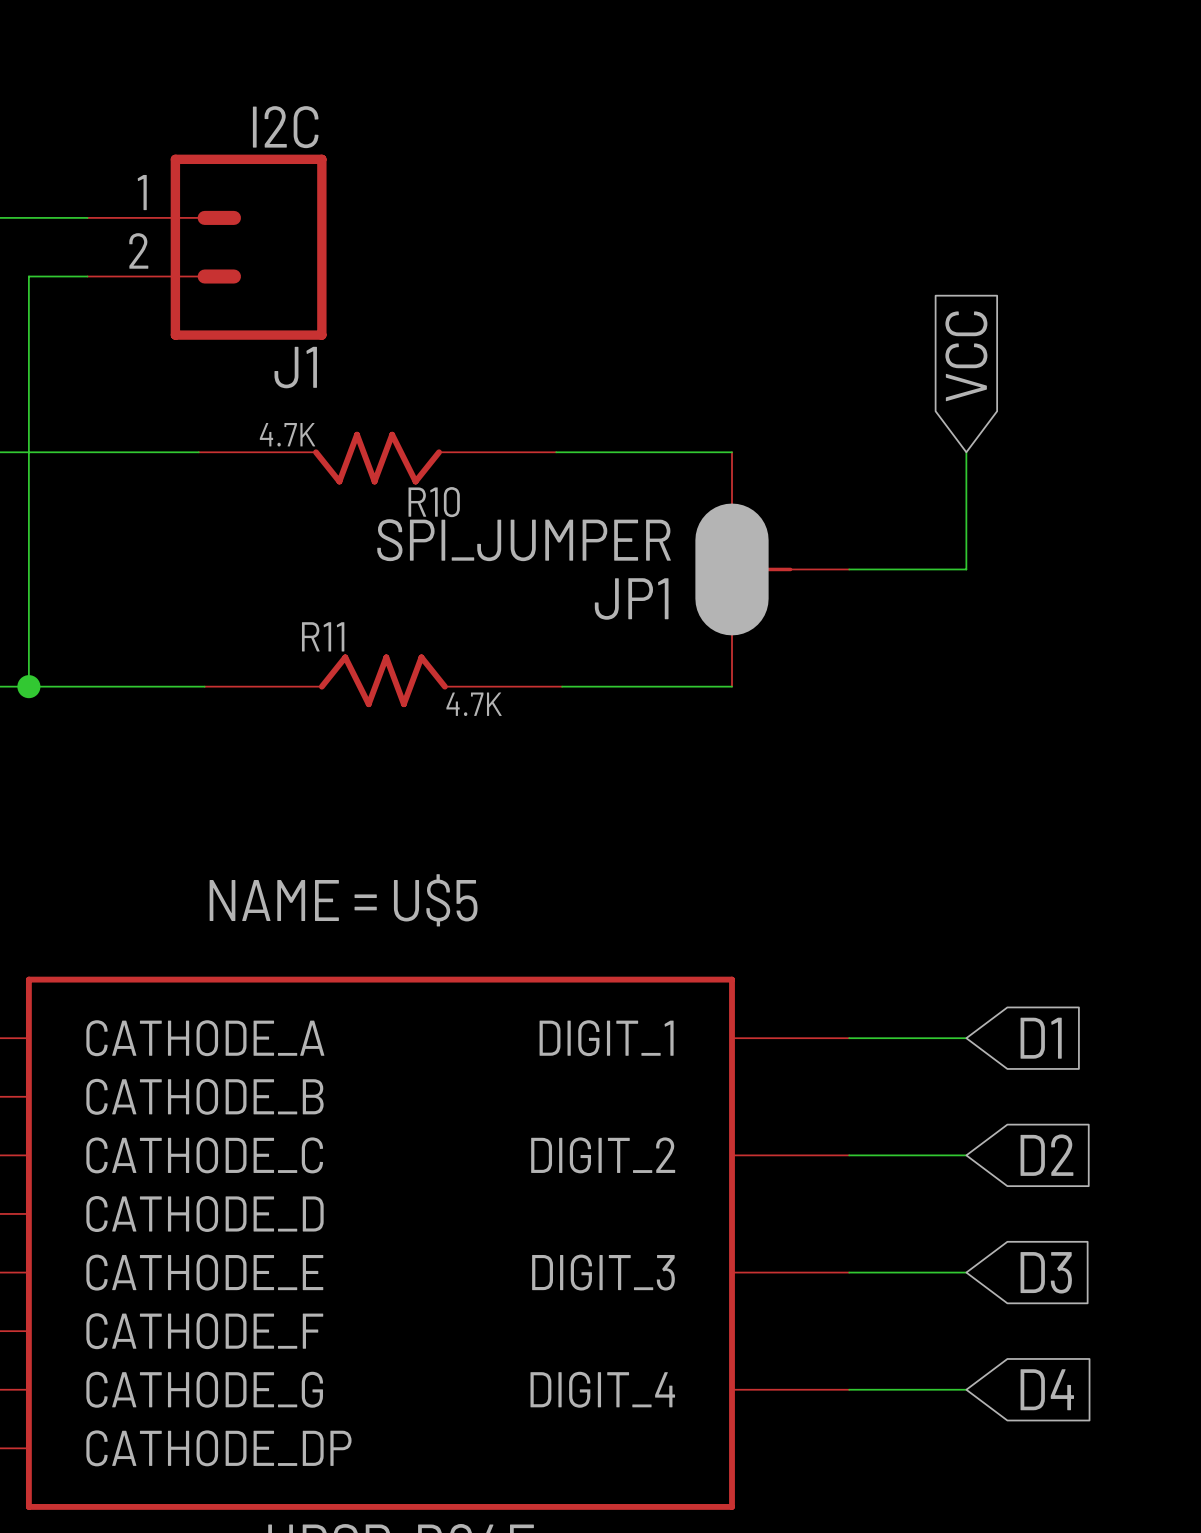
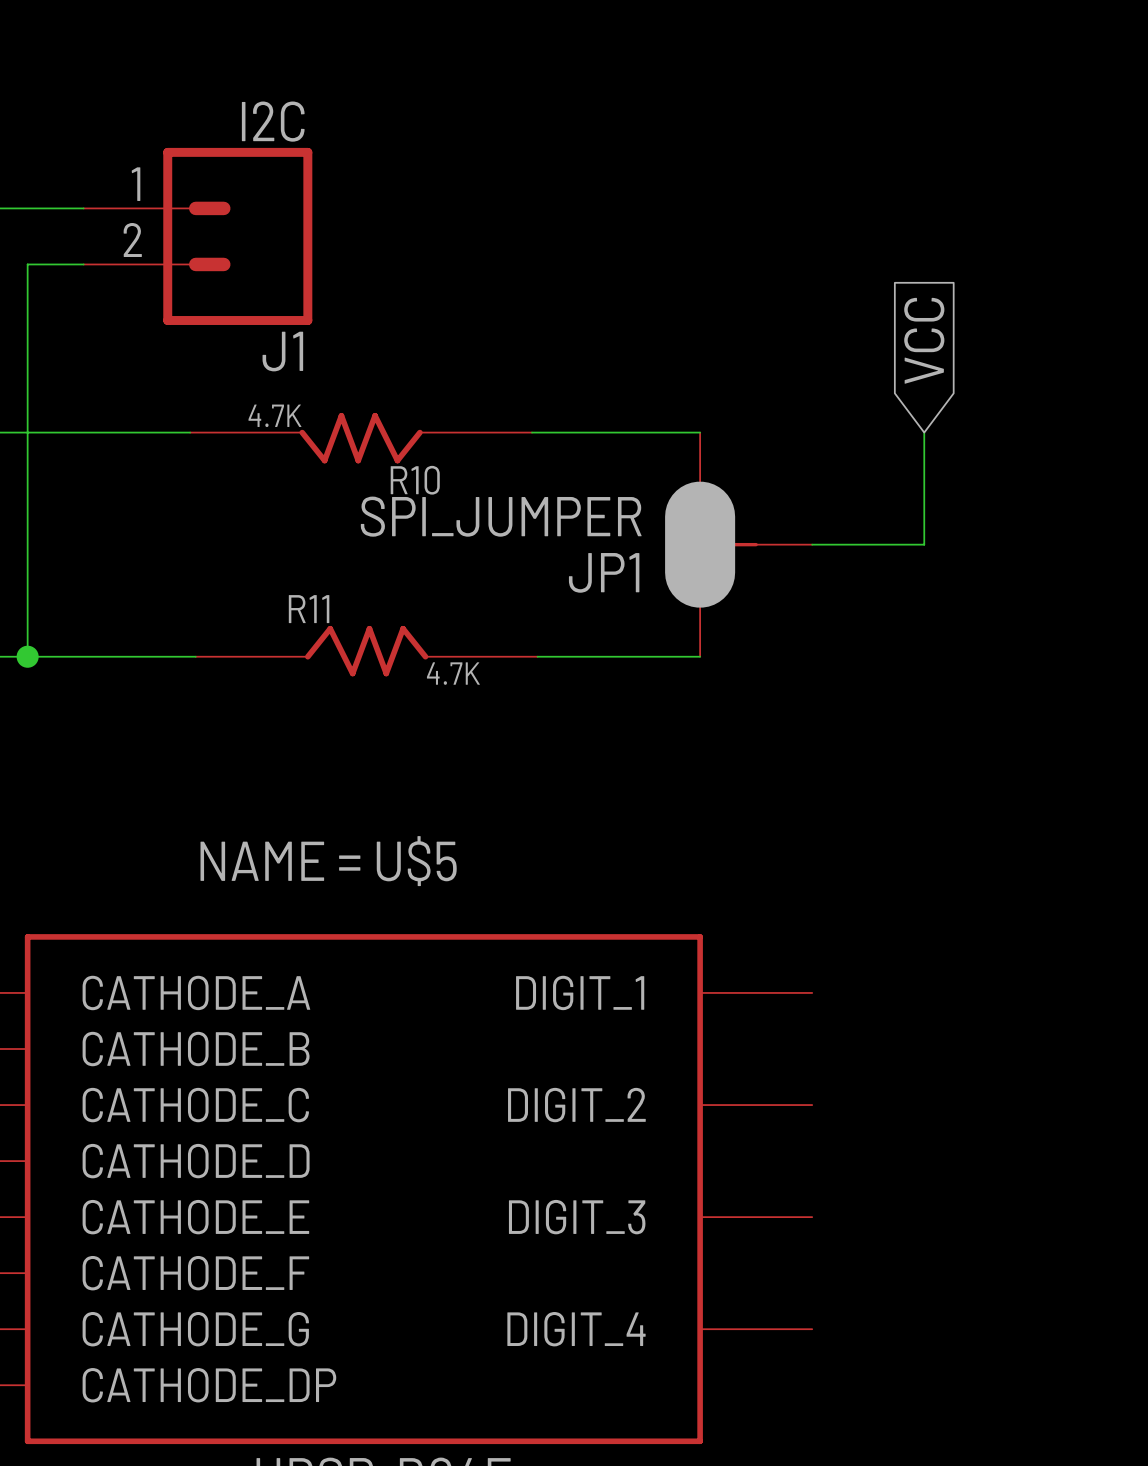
wire: (849, 1038) (966, 1038) -> none
global label: D1 (1041, 1038) -> none
wire: (849, 1155) (966, 1155) -> none
global label: D2 (1046, 1155) -> none
wire: (849, 1272) (966, 1272) -> none
global label: D3 (1046, 1272) -> none
wire: (849, 1389) (966, 1389) -> none
global label: D4 (1047, 1389) -> none

